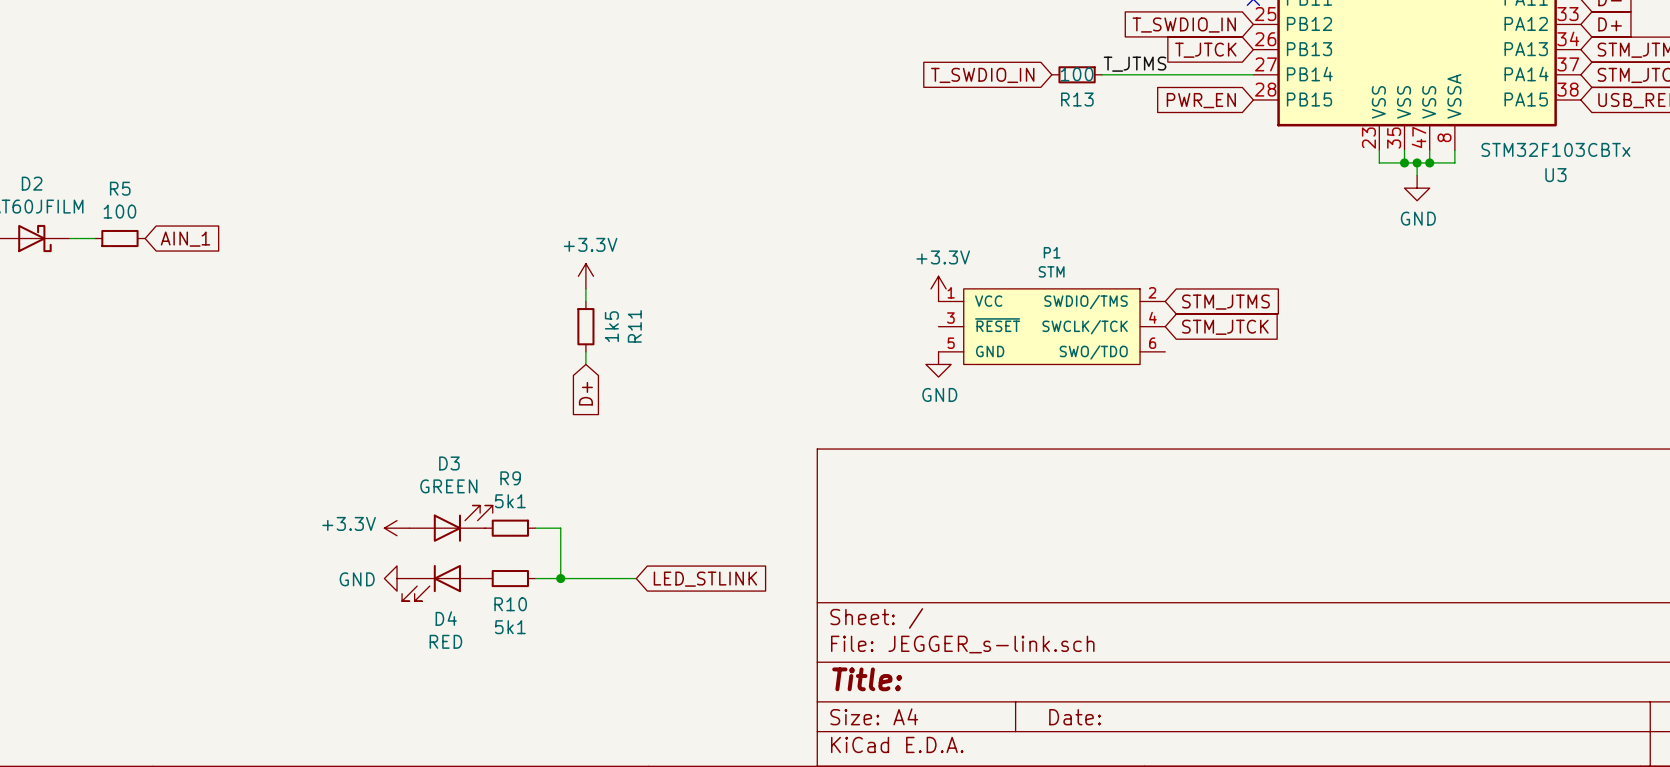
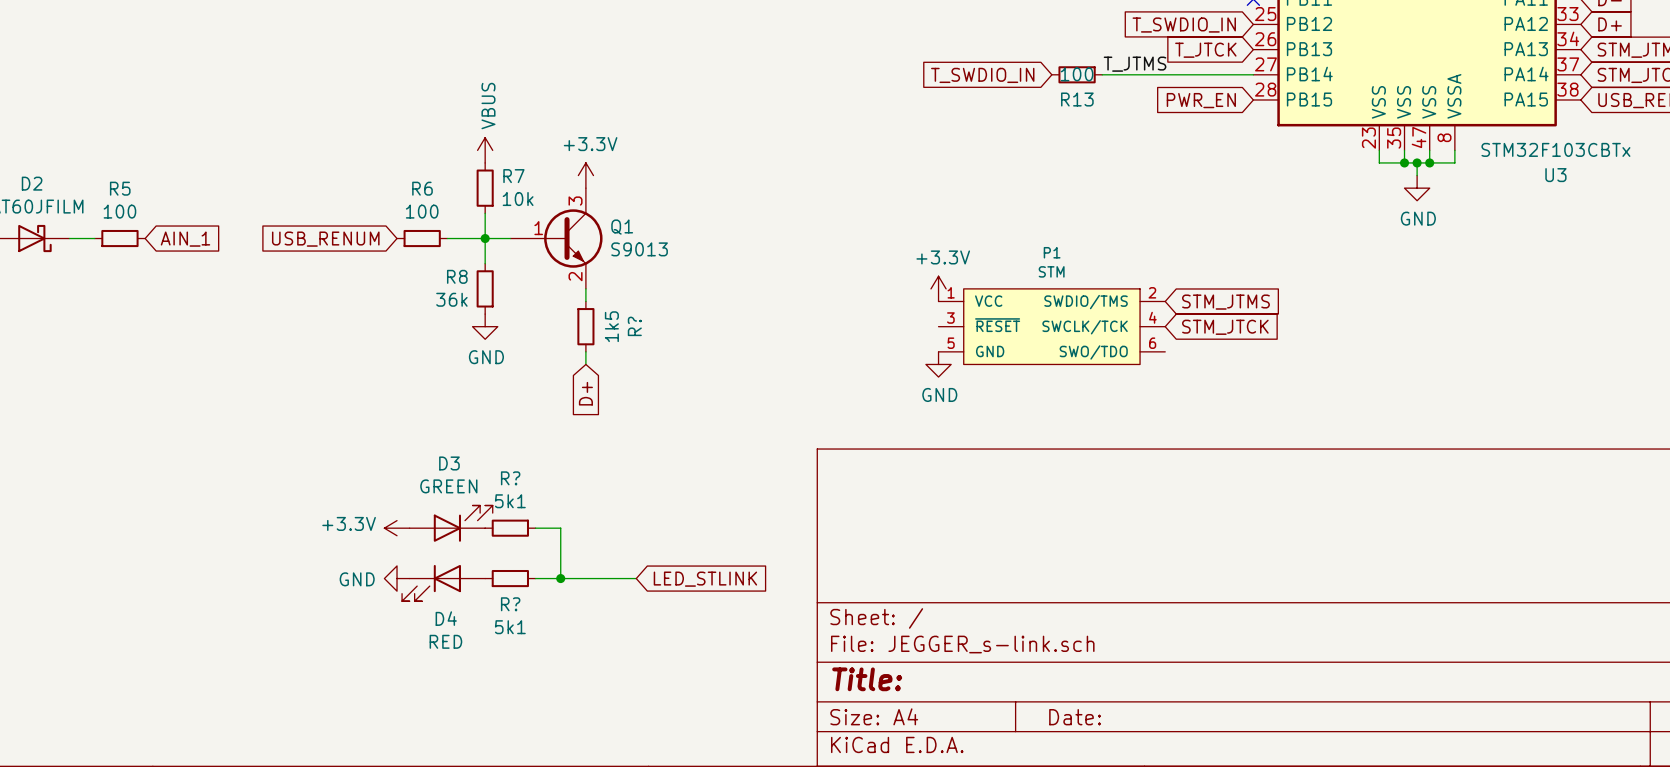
power symbol: none -> VBUS (485, 150)
R7: none -> 10k (485, 188)
wire: none -> (485, 213) (485, 263)
R6: none -> 100 (422, 238)
wire: none -> (447, 238) (510, 238)
junction: none -> (485, 238)
Q1: none -> S9013 (556, 238)
global label: none -> USB_RENUM (325, 239)
power symbol position: +3.3V (585, 276) -> +3.3V (585, 175)
R8: none -> 36k (485, 288)
power symbol: none -> GND (485, 326)
R11 name: R11 (634, 326) -> R? (634, 326)
R9 name: R9 (510, 478) -> R? (510, 478)
R10 name: R10 (510, 604) -> R? (510, 604)

